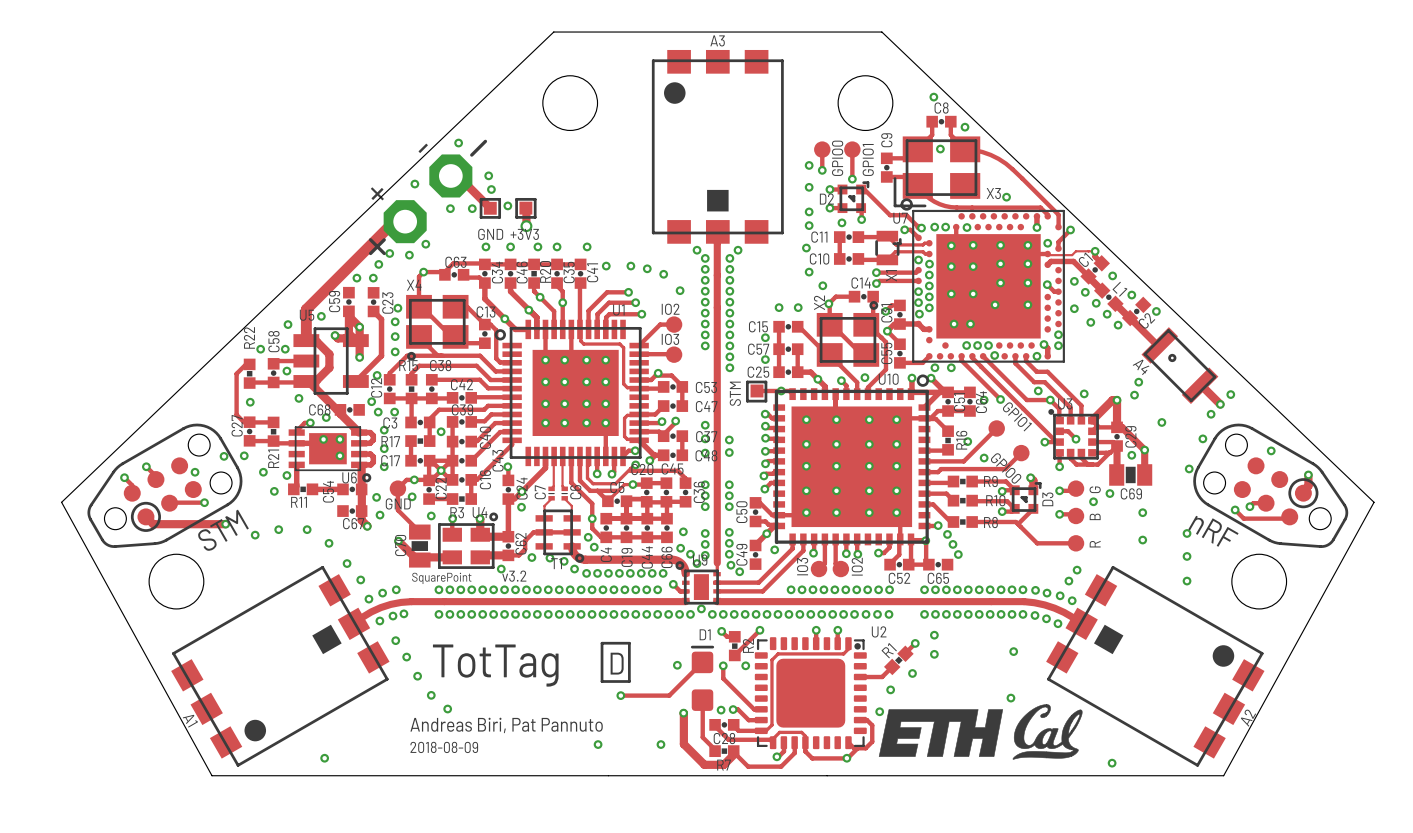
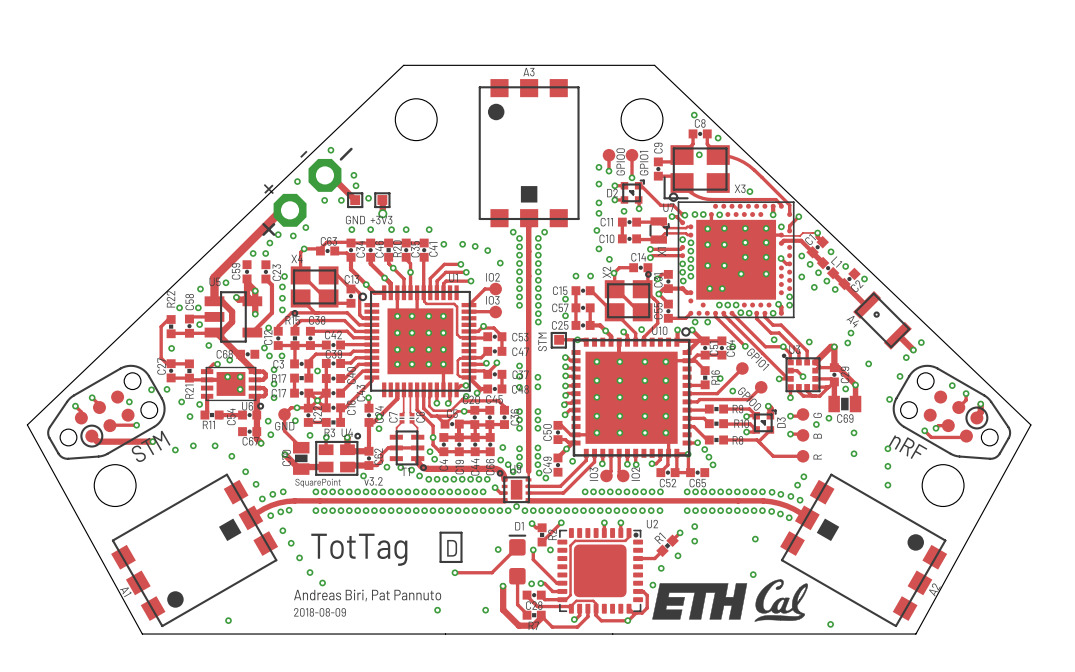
via: none -> (749, 313)
track: none -> (966, 393) (966, 400) (958, 407)
via: none -> (966, 393)

